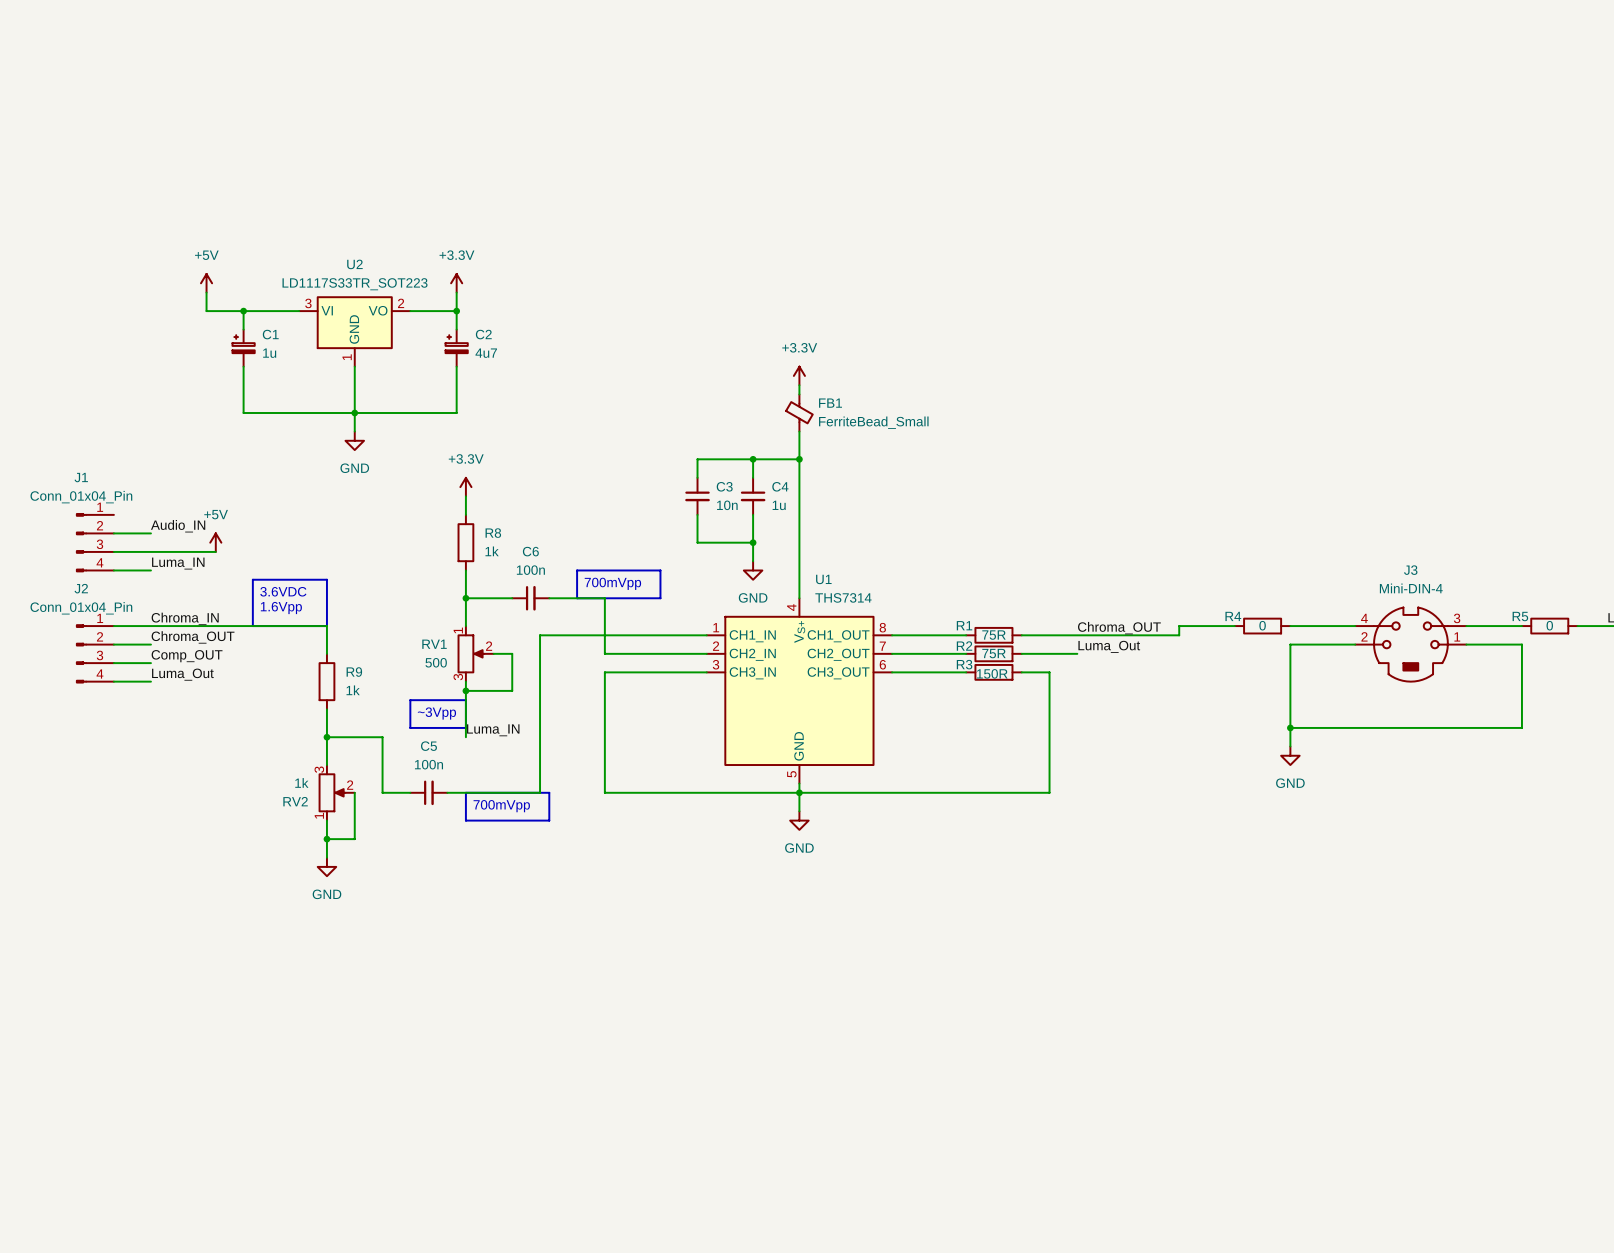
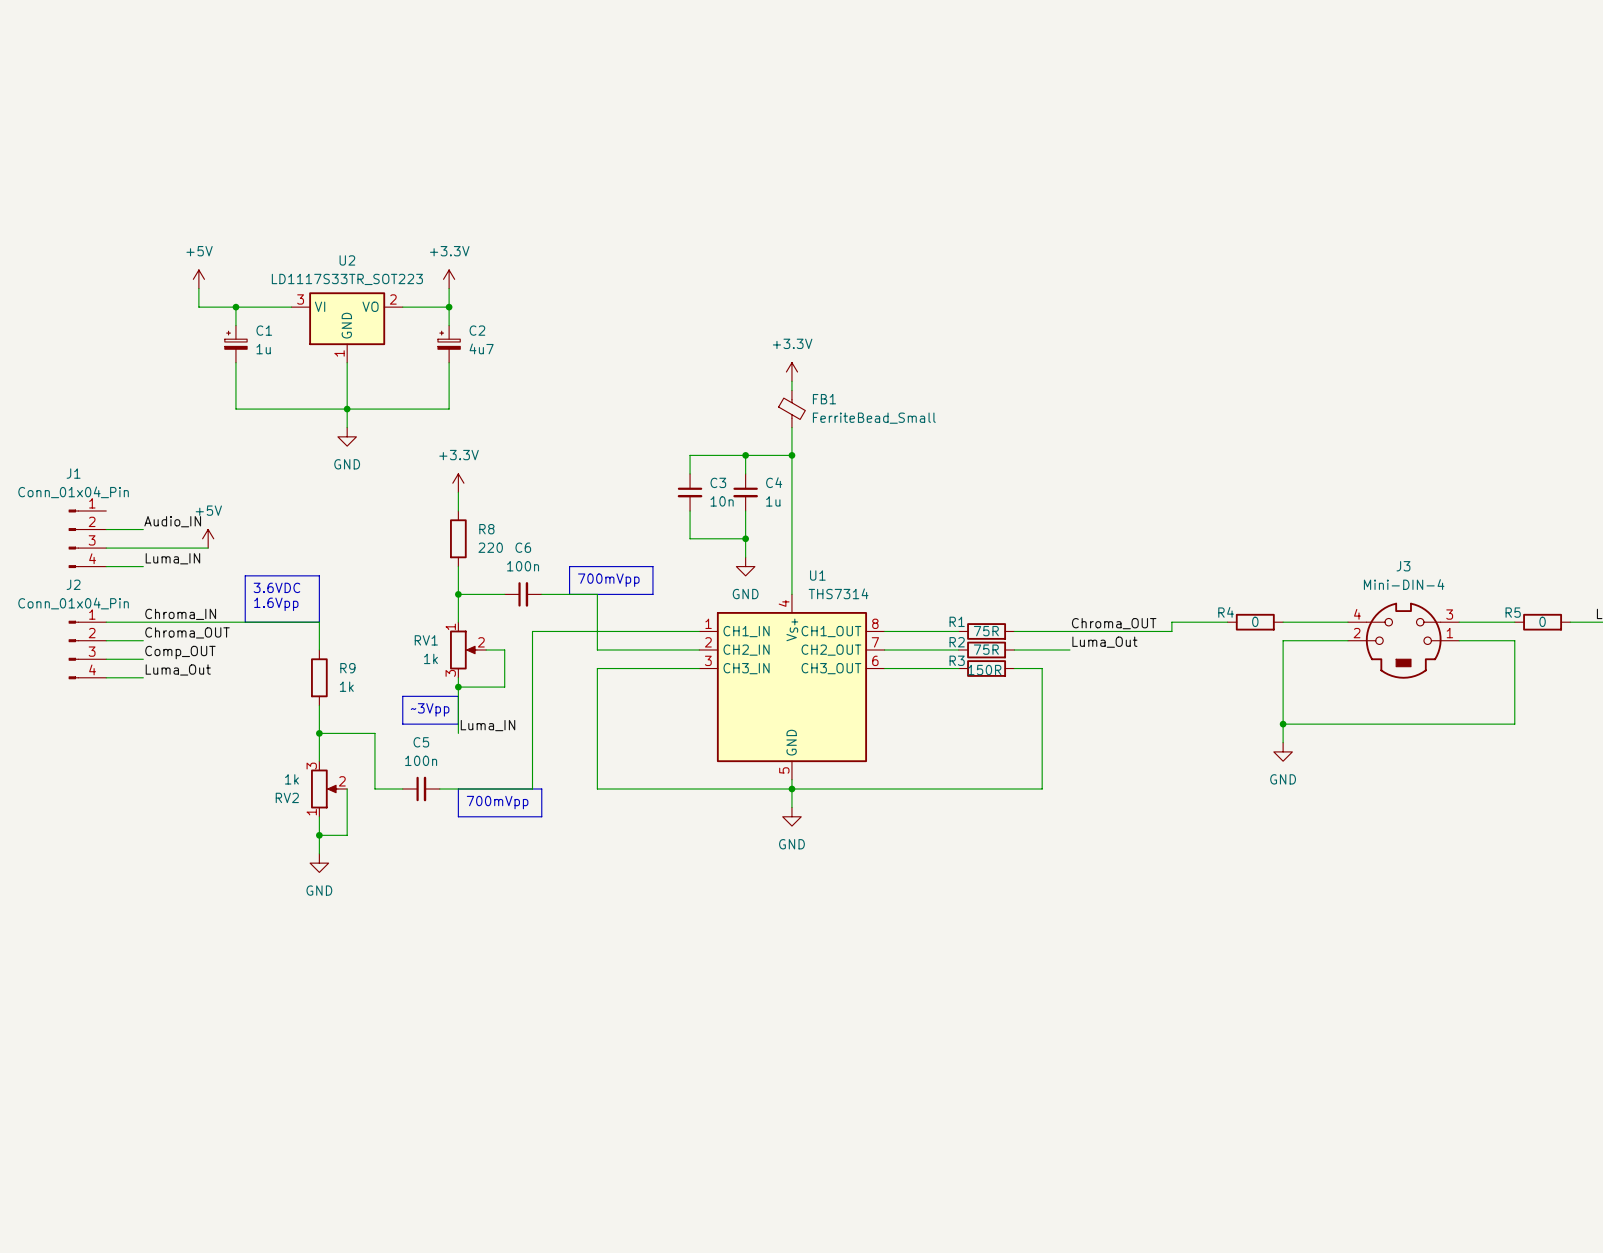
R8 value: 1k (492, 551) -> 220 (490, 547)
RV1 value: 500 (436, 662) -> 1k (430, 658)

